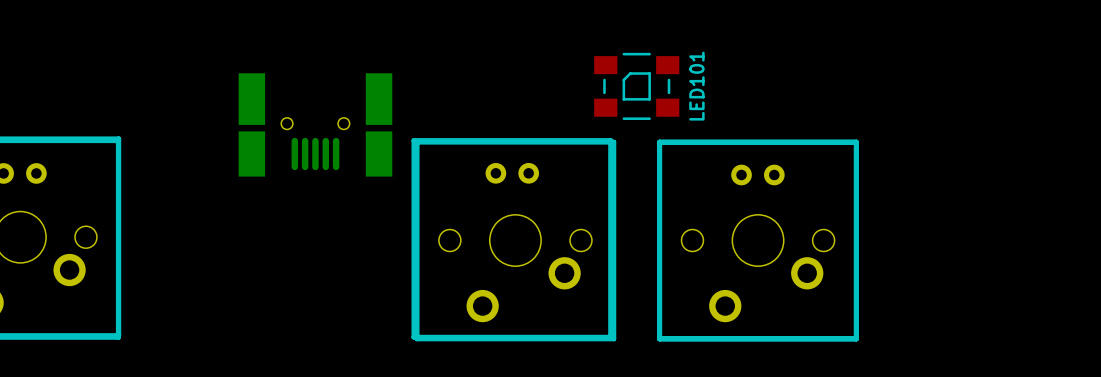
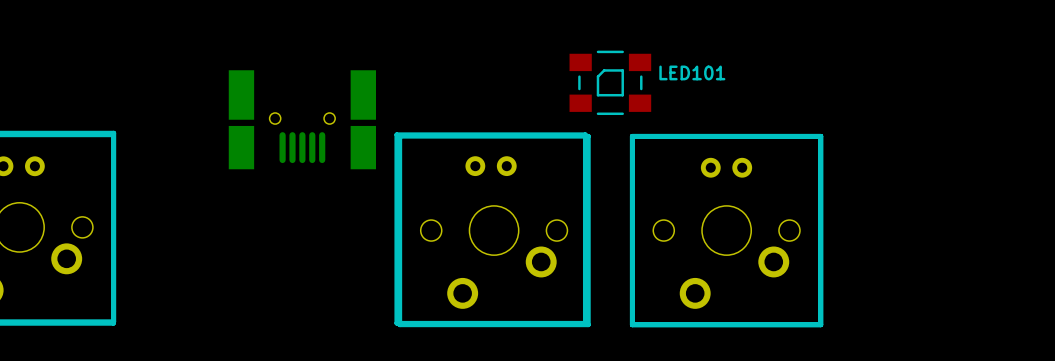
LED101 name rotation: 0° (696, 86) -> 90° clockwise (692, 72)

